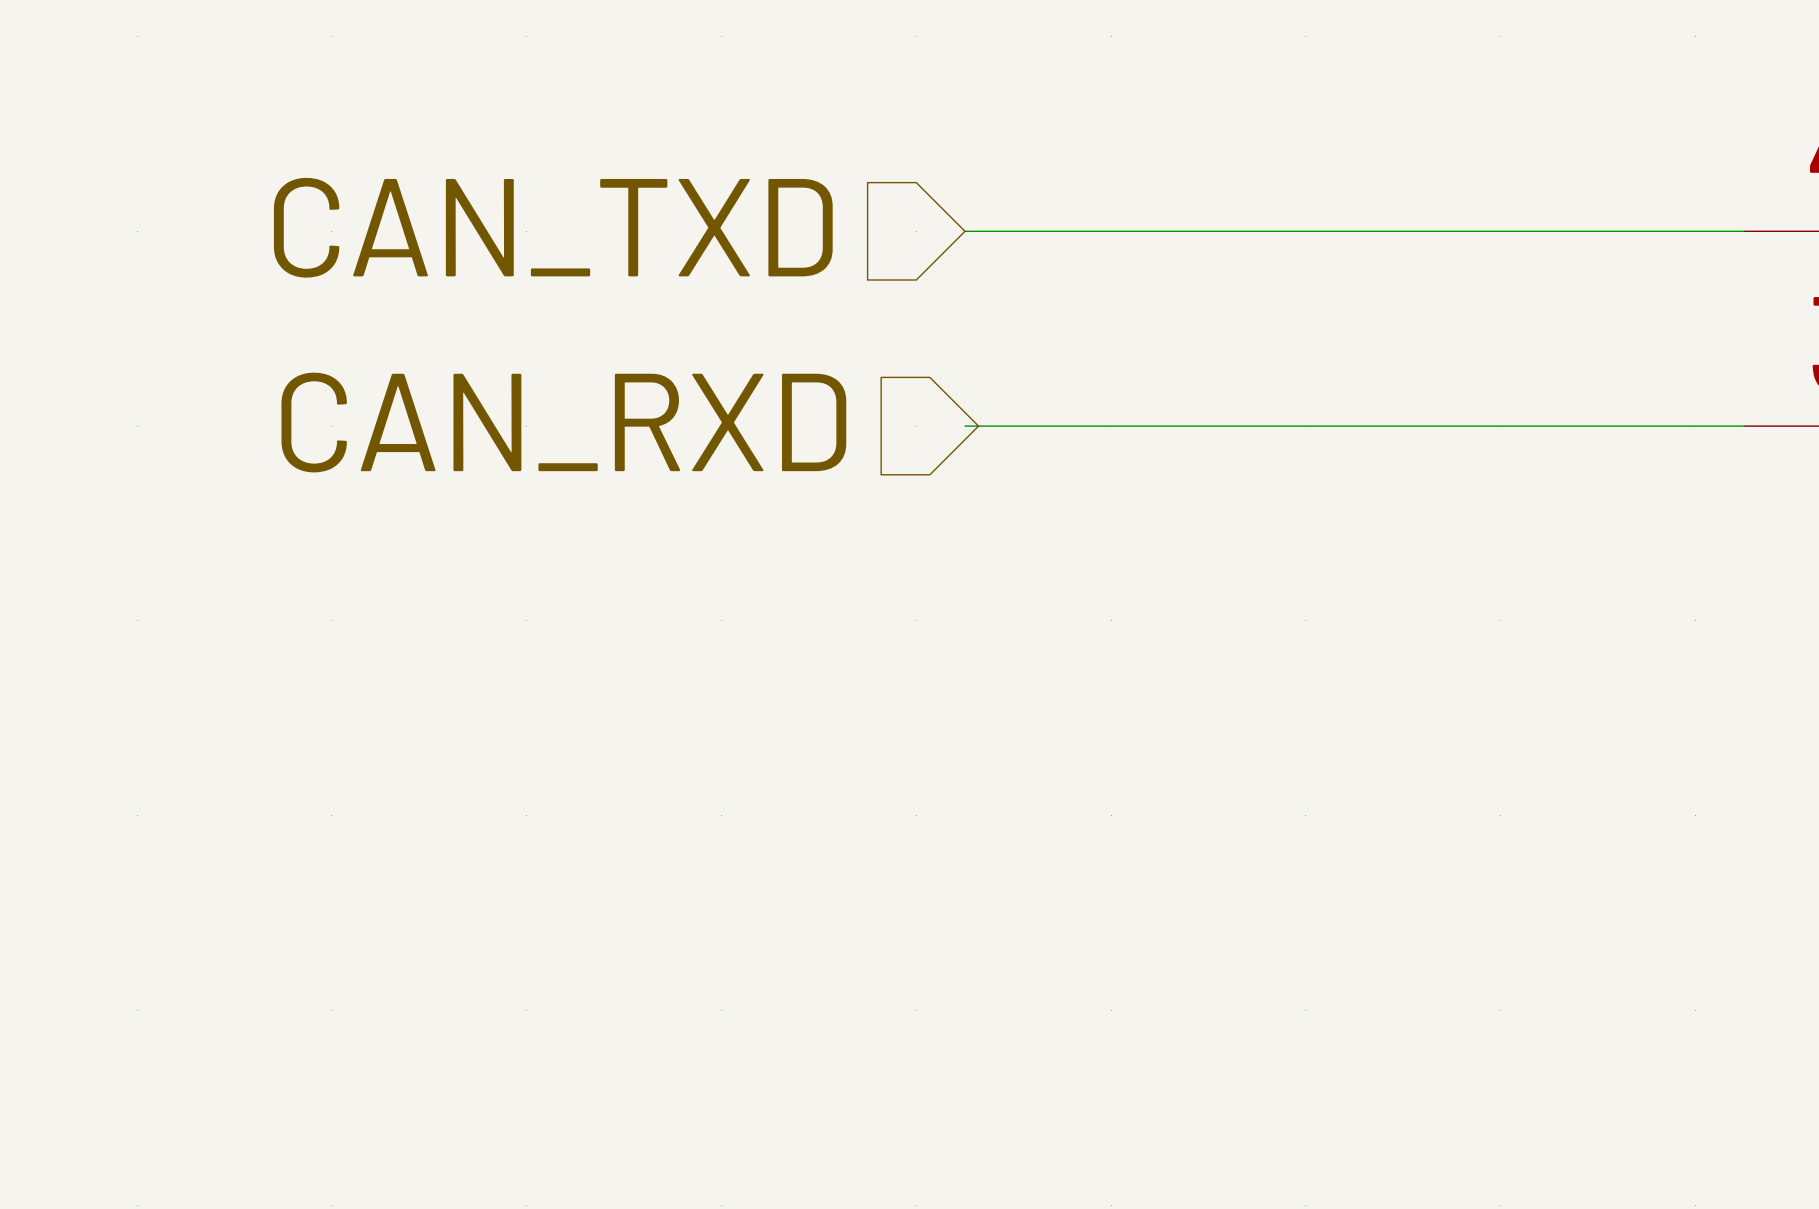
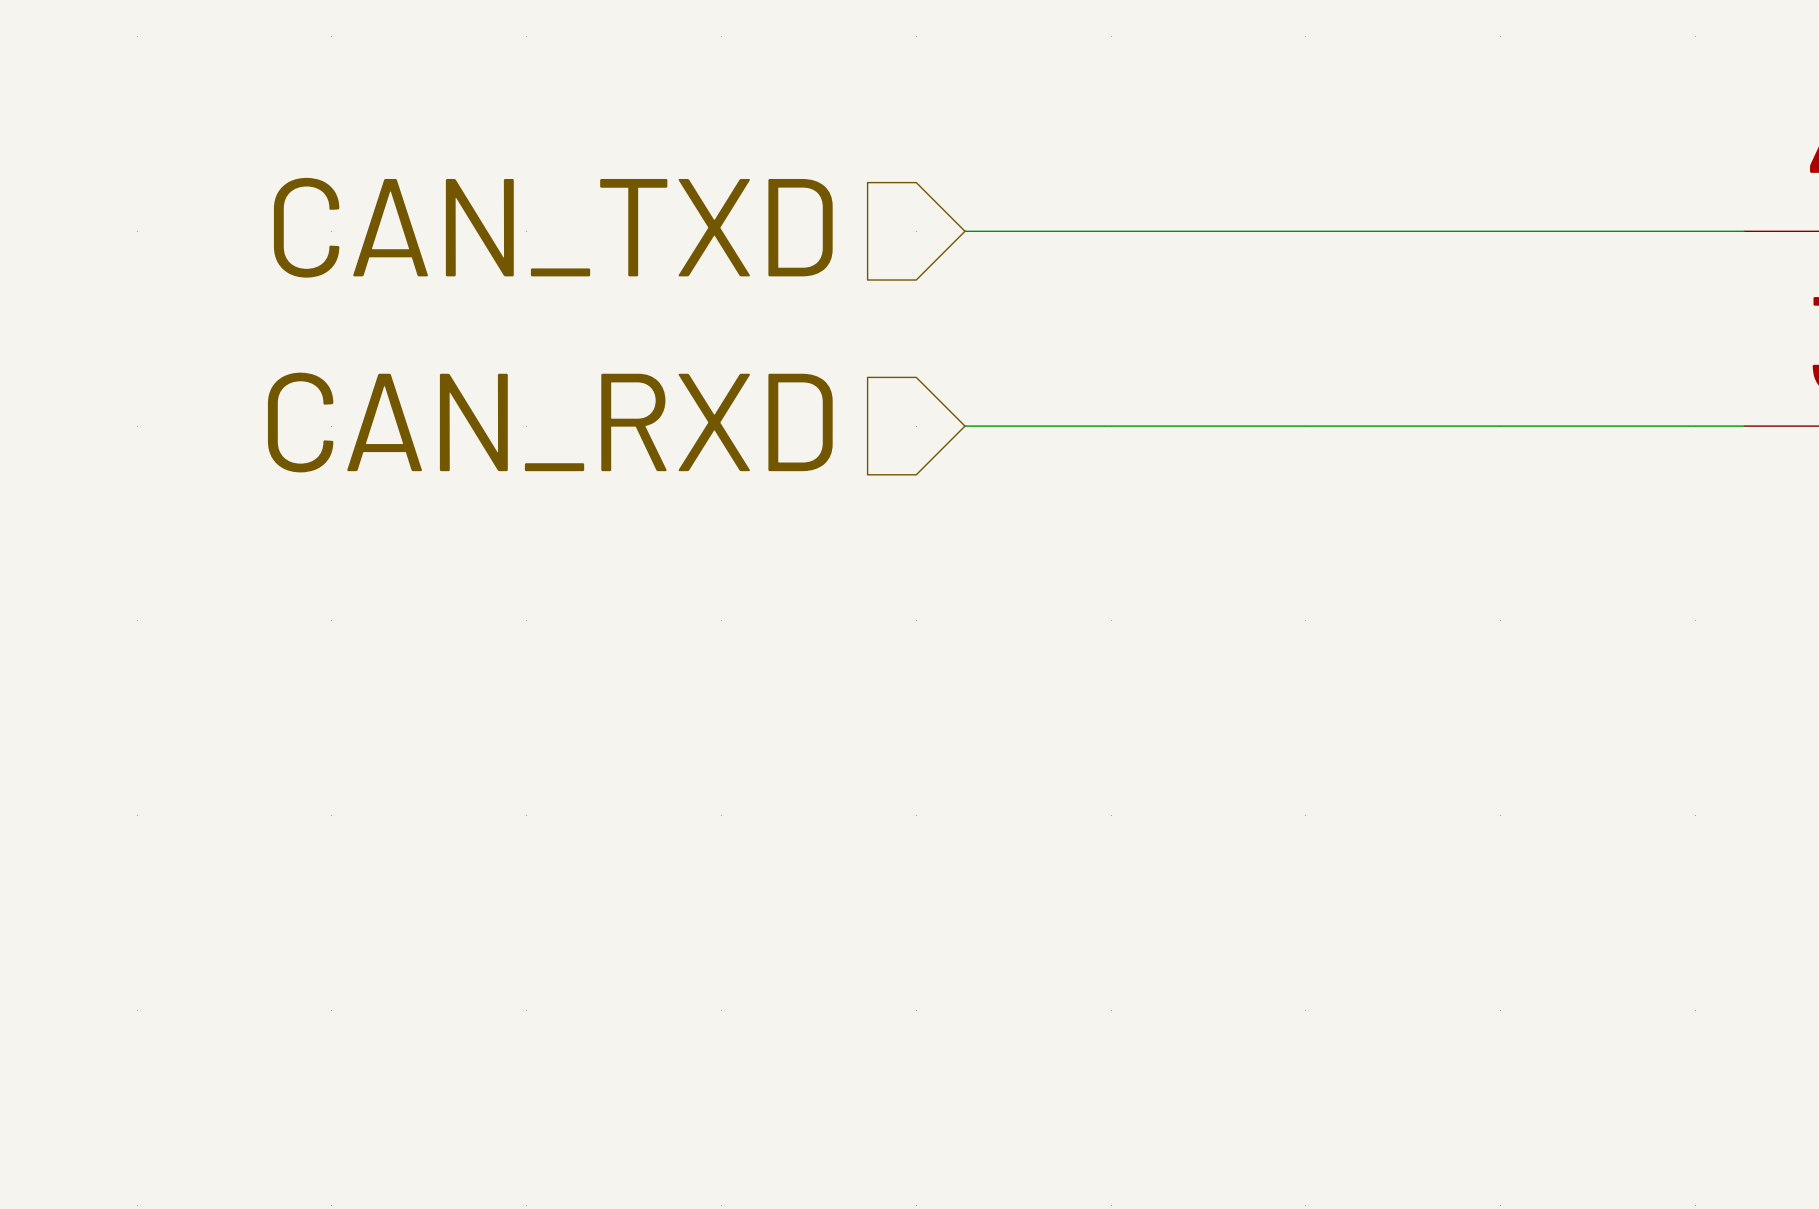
hierarchical label position: CAN_RXD (563, 422) -> CAN_RXD (550, 422)

